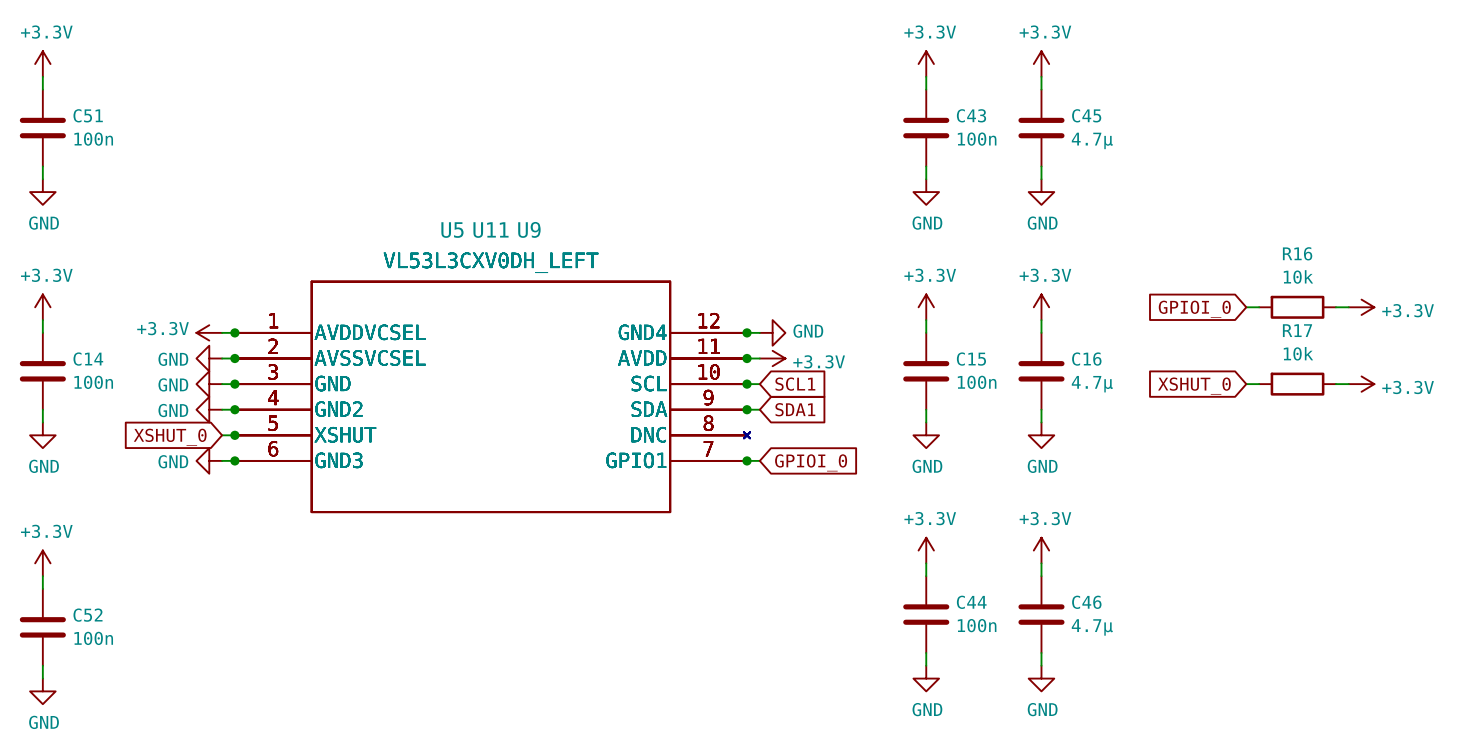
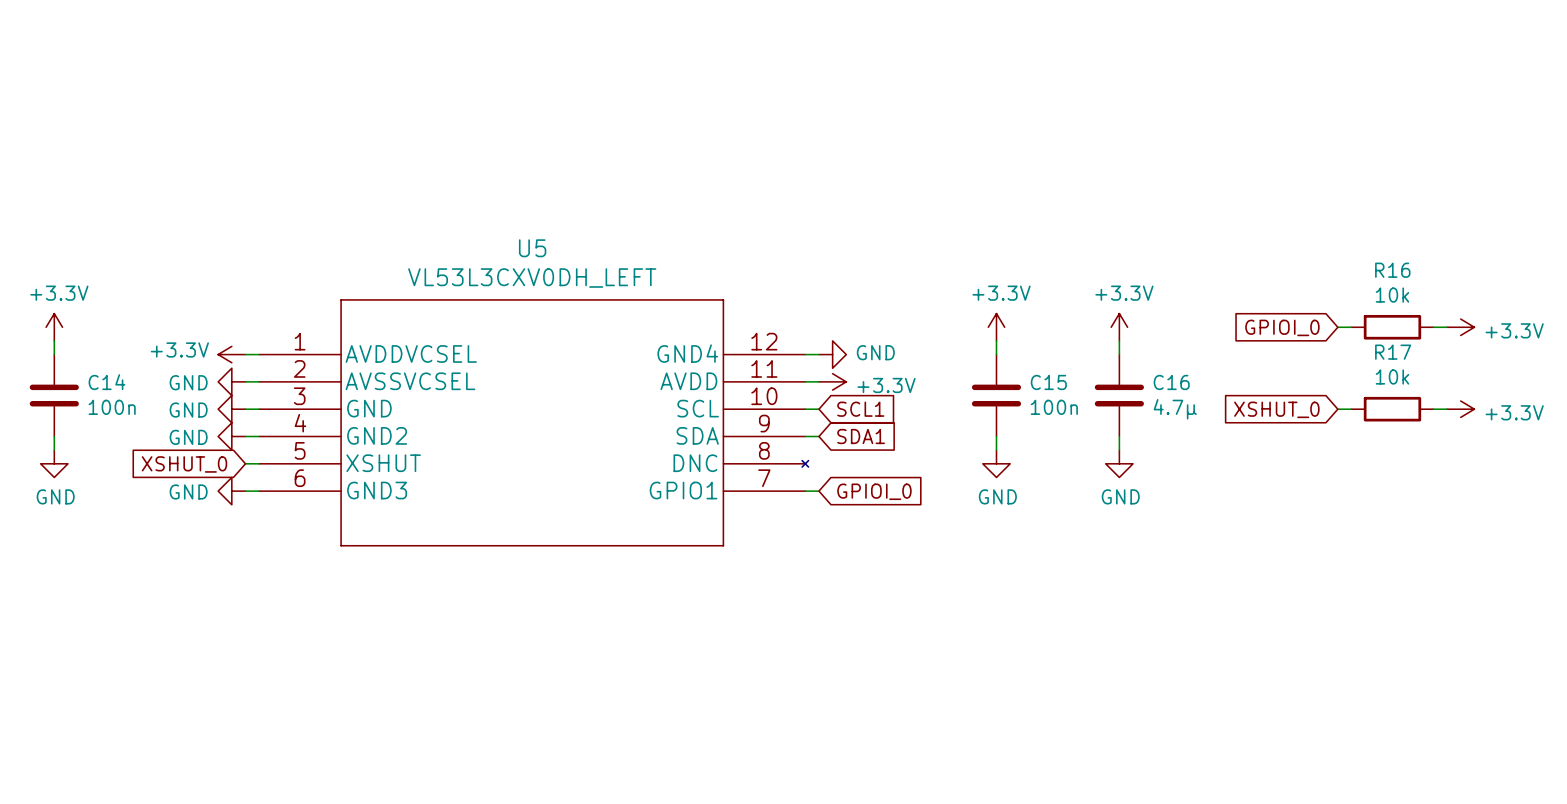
power symbol: +3.3V (42, 64) -> none
power symbol: +3.3V (926, 64) -> none
power symbol: +3.3V (1041, 64) -> none
wire: (42, 76) (42, 89) -> none
wire: (926, 76) (926, 89) -> none
wire: (1041, 76) (1041, 89) -> none
C51: 100n (42, 128) -> none
C43: 100n (926, 128) -> none
C45: 4.7µ (1041, 128) -> none
wire: (42, 166) (42, 179) -> none
wire: (926, 166) (926, 179) -> none
wire: (1041, 166) (1041, 179) -> none
power symbol: GND (42, 192) -> none
power symbol: GND (926, 192) -> none
power symbol: GND (1041, 192) -> none
U5 name position: U5 (452, 230) -> U5 (532, 248)
junction: (234, 332) -> none
junction: (747, 332) -> none
junction: (234, 358) -> none
junction: (747, 358) -> none
junction: (234, 384) -> none
junction: (747, 384) -> none
U9: VL53L3CXV0DH_LEFT (492, 396) -> none
U11: VL53L3CXV0DH_LEFT (492, 396) -> none
junction: (234, 409) -> none
junction: (747, 409) -> none
junction: (234, 435) -> none
junction: (234, 460) -> none
junction: (747, 460) -> none
power symbol: +3.3V (926, 550) -> none
power symbol: +3.3V (1041, 550) -> none
power symbol: +3.3V (42, 563) -> none
wire: (926, 563) (926, 576) -> none
wire: (1041, 563) (1041, 576) -> none
wire: (42, 576) (42, 588) -> none
C44: 100n (926, 614) -> none
C46: 4.7µ (1041, 614) -> none
C52: 100n (42, 627) -> none
wire: (926, 652) (926, 665) -> none
wire: (1041, 652) (1041, 665) -> none
wire: (42, 665) (42, 678) -> none
power symbol: GND (926, 678) -> none
power symbol: GND (1041, 678) -> none
power symbol: GND (42, 691) -> none

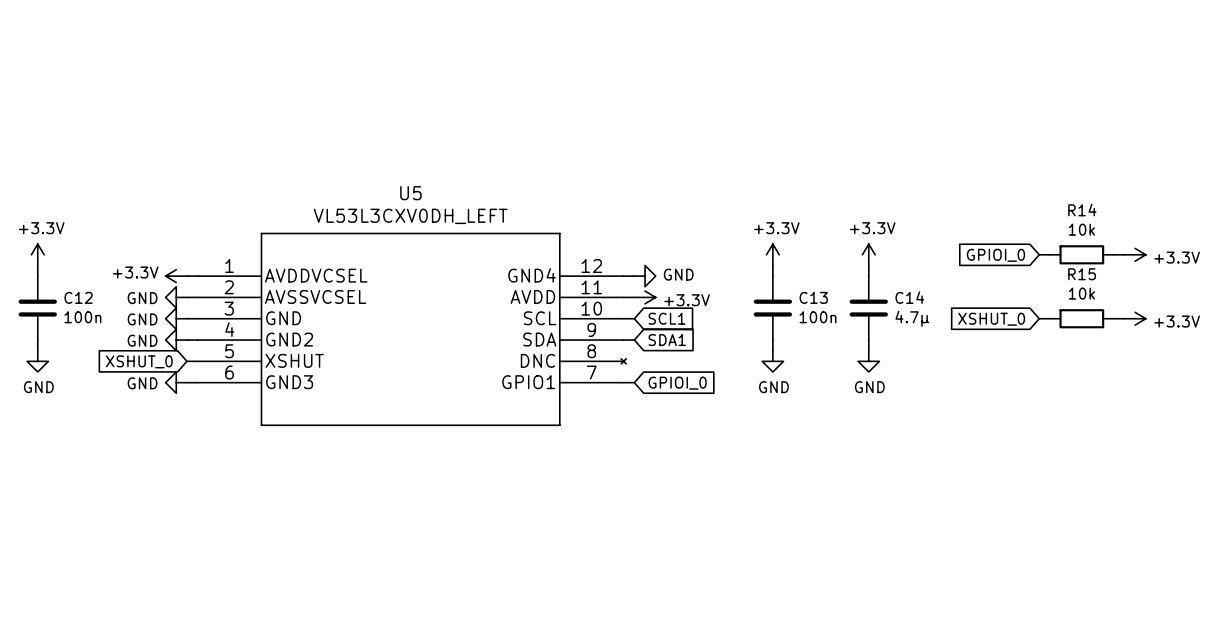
R16 name: R16 (1392, 270) -> R14 (1082, 210)
R17 name: R17 (1393, 352) -> R15 (1082, 274)
C14 name: C14 (106, 382) -> C12 (78, 297)
C15 name: C15 (1048, 382) -> C13 (813, 297)
C16 name: C16 (1171, 382) -> C14 (909, 297)

